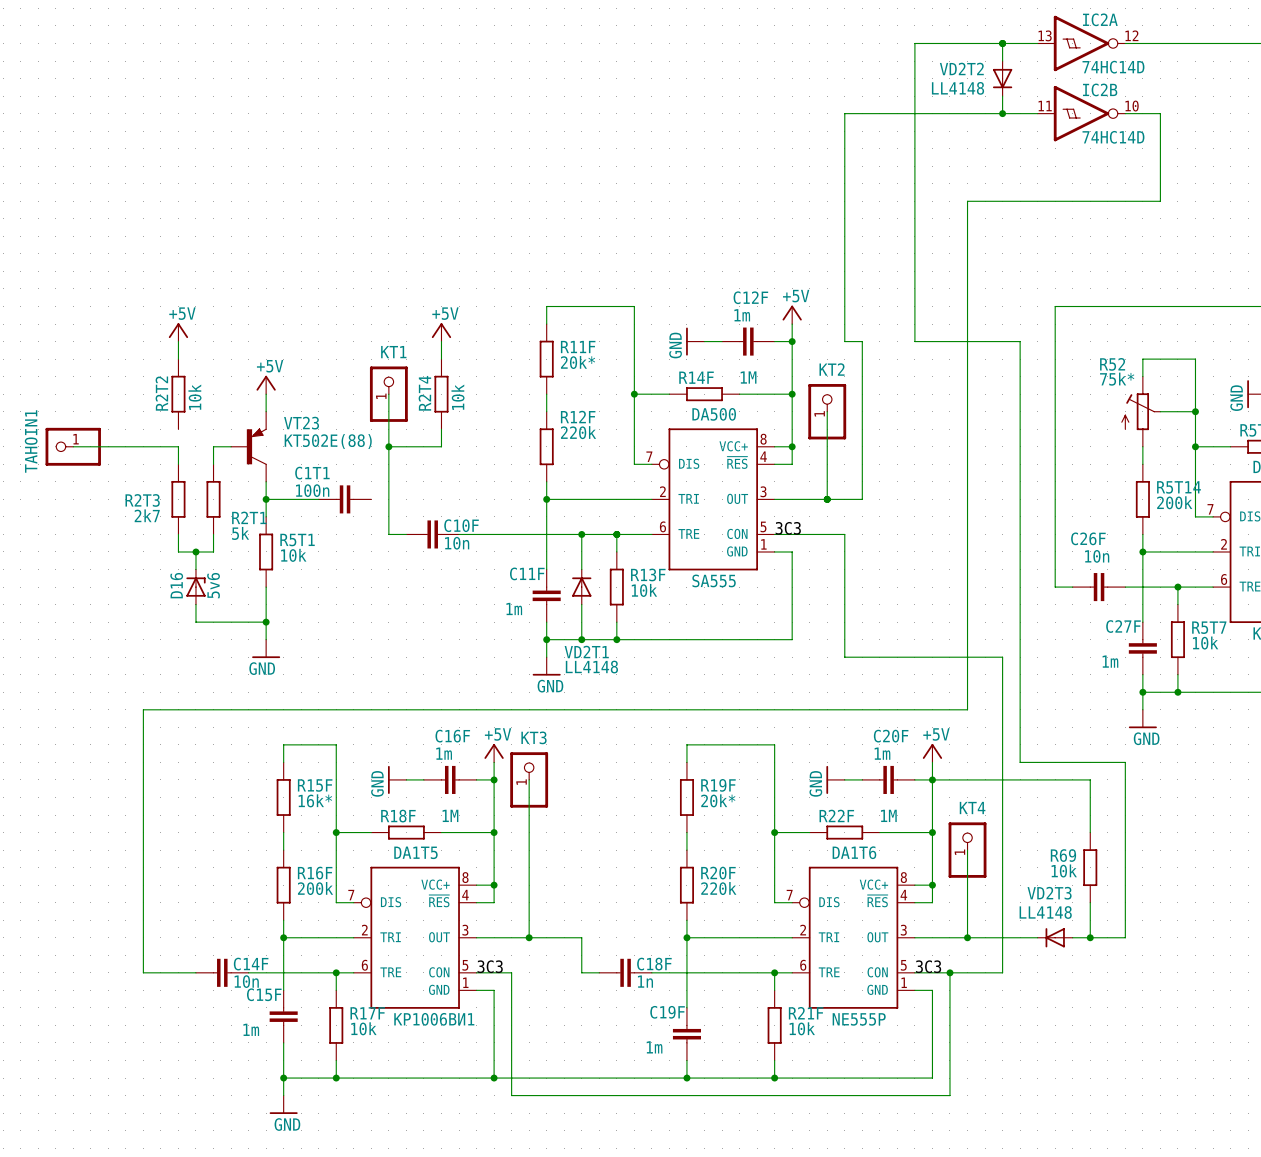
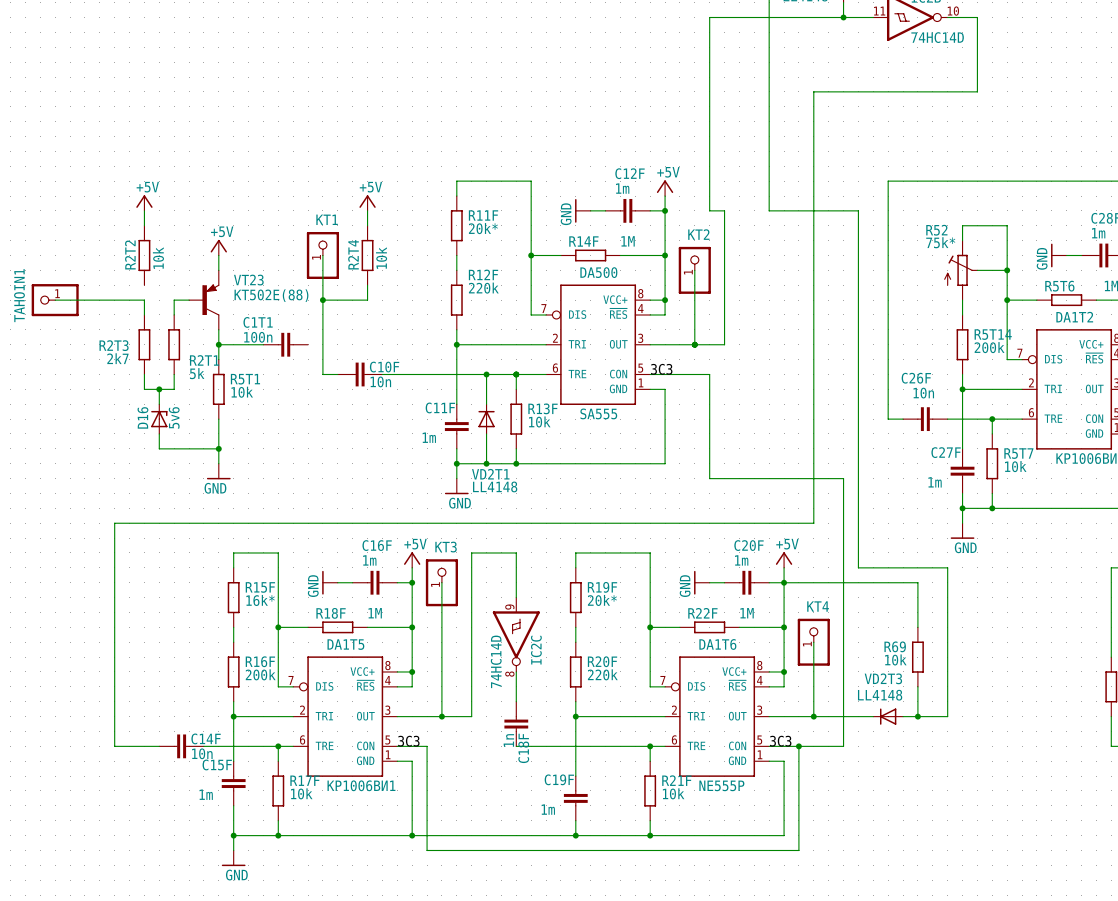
IC2C: none -> 74HC14D (516, 634)
wire: none -> (516, 671) (516, 701)
wire: (564, 937) (581, 937) (581, 972) (599, 972) -> (471, 716) (471, 552) (516, 552) (516, 597)
C18F rotation: 0° (625, 972) -> 90° clockwise (516, 724)

